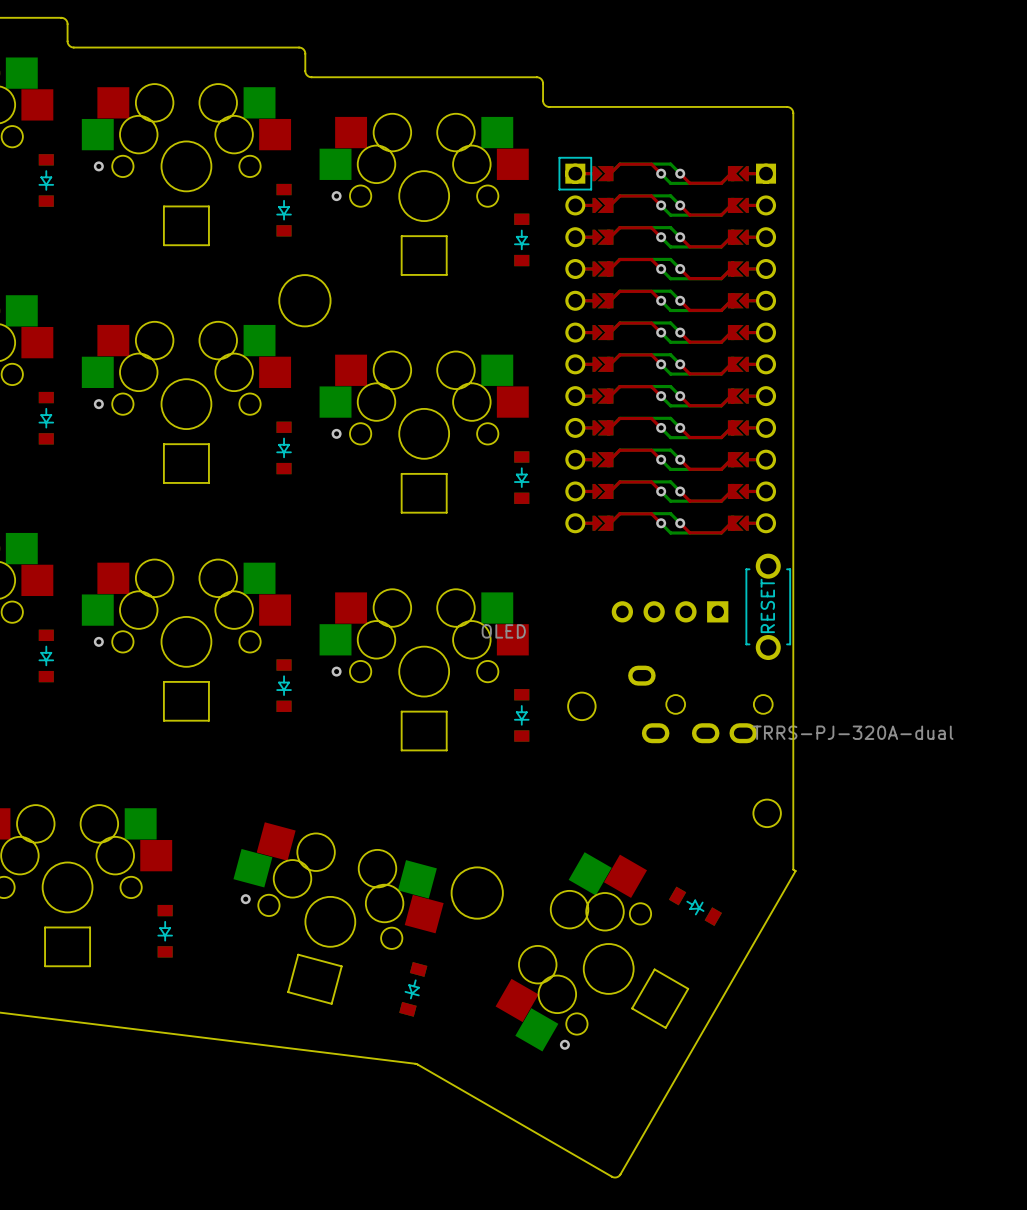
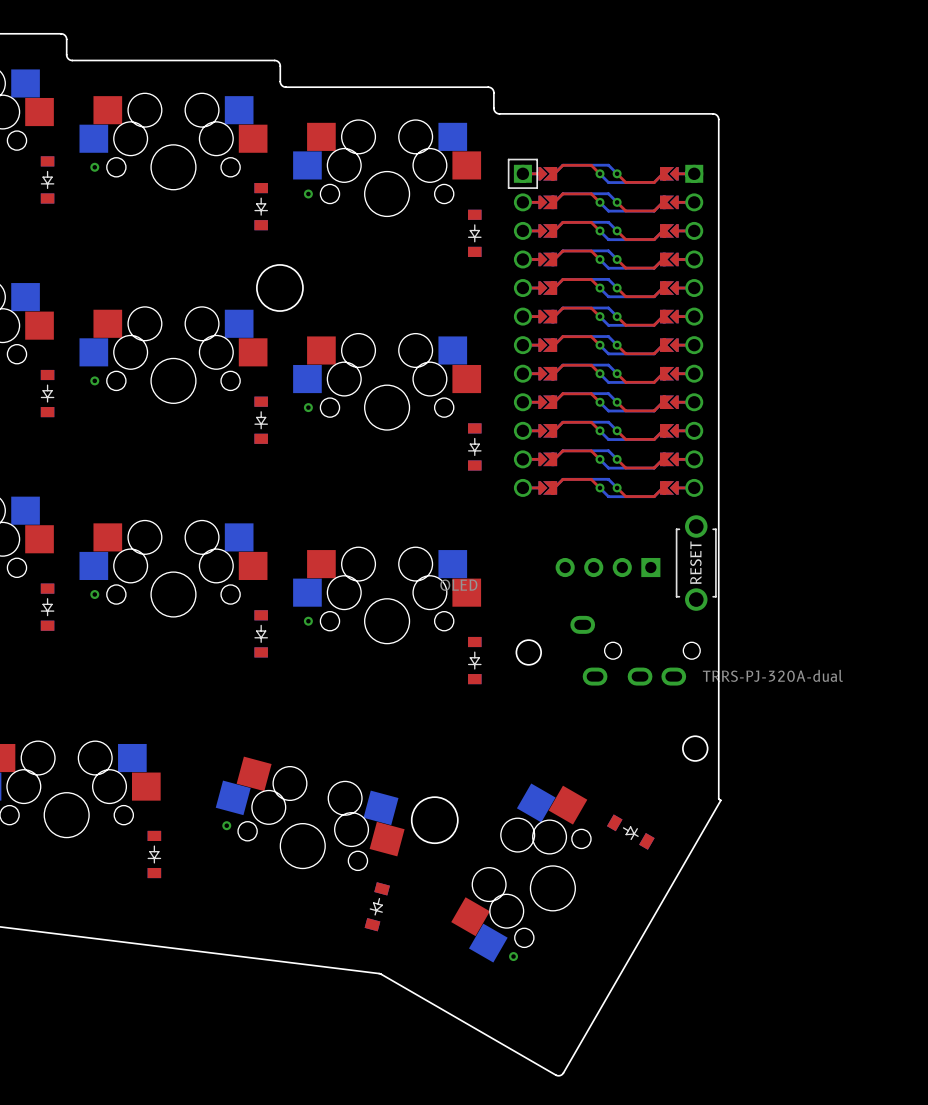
board edge: (163, 206) (163, 245) (208, 245) (208, 206) (163, 206) -> none
board edge: (401, 236) (401, 274) (446, 274) (446, 236) (401, 236) -> none
board edge: (163, 444) (163, 482) (208, 482) (208, 444) (163, 444) -> none
board edge: (401, 473) (401, 512) (446, 512) (446, 473) (401, 473) -> none
board edge: (163, 681) (208, 681) (208, 720) (163, 720) (163, 681) -> none
board edge: (401, 711) (446, 711) (446, 750) (401, 750) (401, 711) -> none
board edge: (45, 927) (90, 927) (90, 966) (45, 966) (45, 927) -> none
board edge: (298, 954) (341, 966) (331, 1003) (288, 992) (298, 954) -> none
board edge: (654, 969) (688, 988) (665, 1027) (632, 1008) (654, 969) -> none

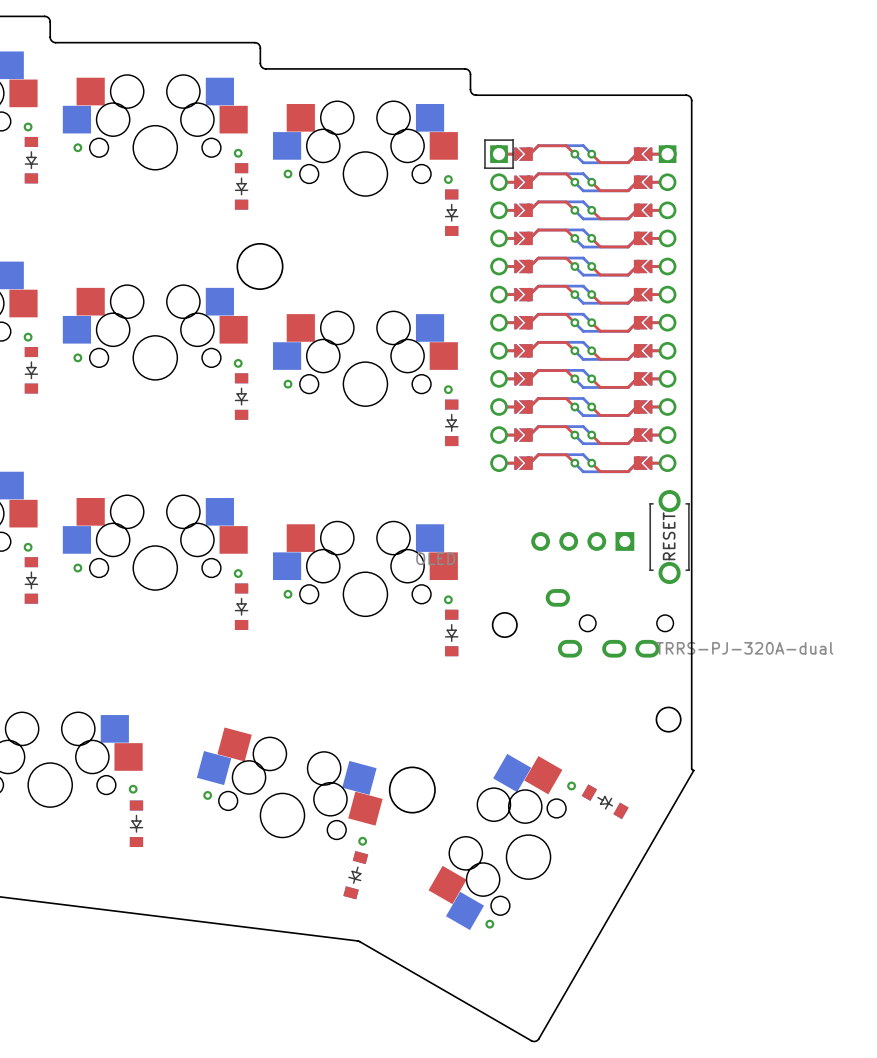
via: none -> (28, 126)
via: none -> (238, 153)
via: none -> (448, 179)
via: none -> (28, 337)
via: none -> (238, 363)
via: none -> (448, 389)
via: none -> (28, 547)
via: none -> (238, 573)
via: none -> (448, 599)
via: none -> (571, 785)
via: none -> (133, 789)
via: none -> (362, 841)

